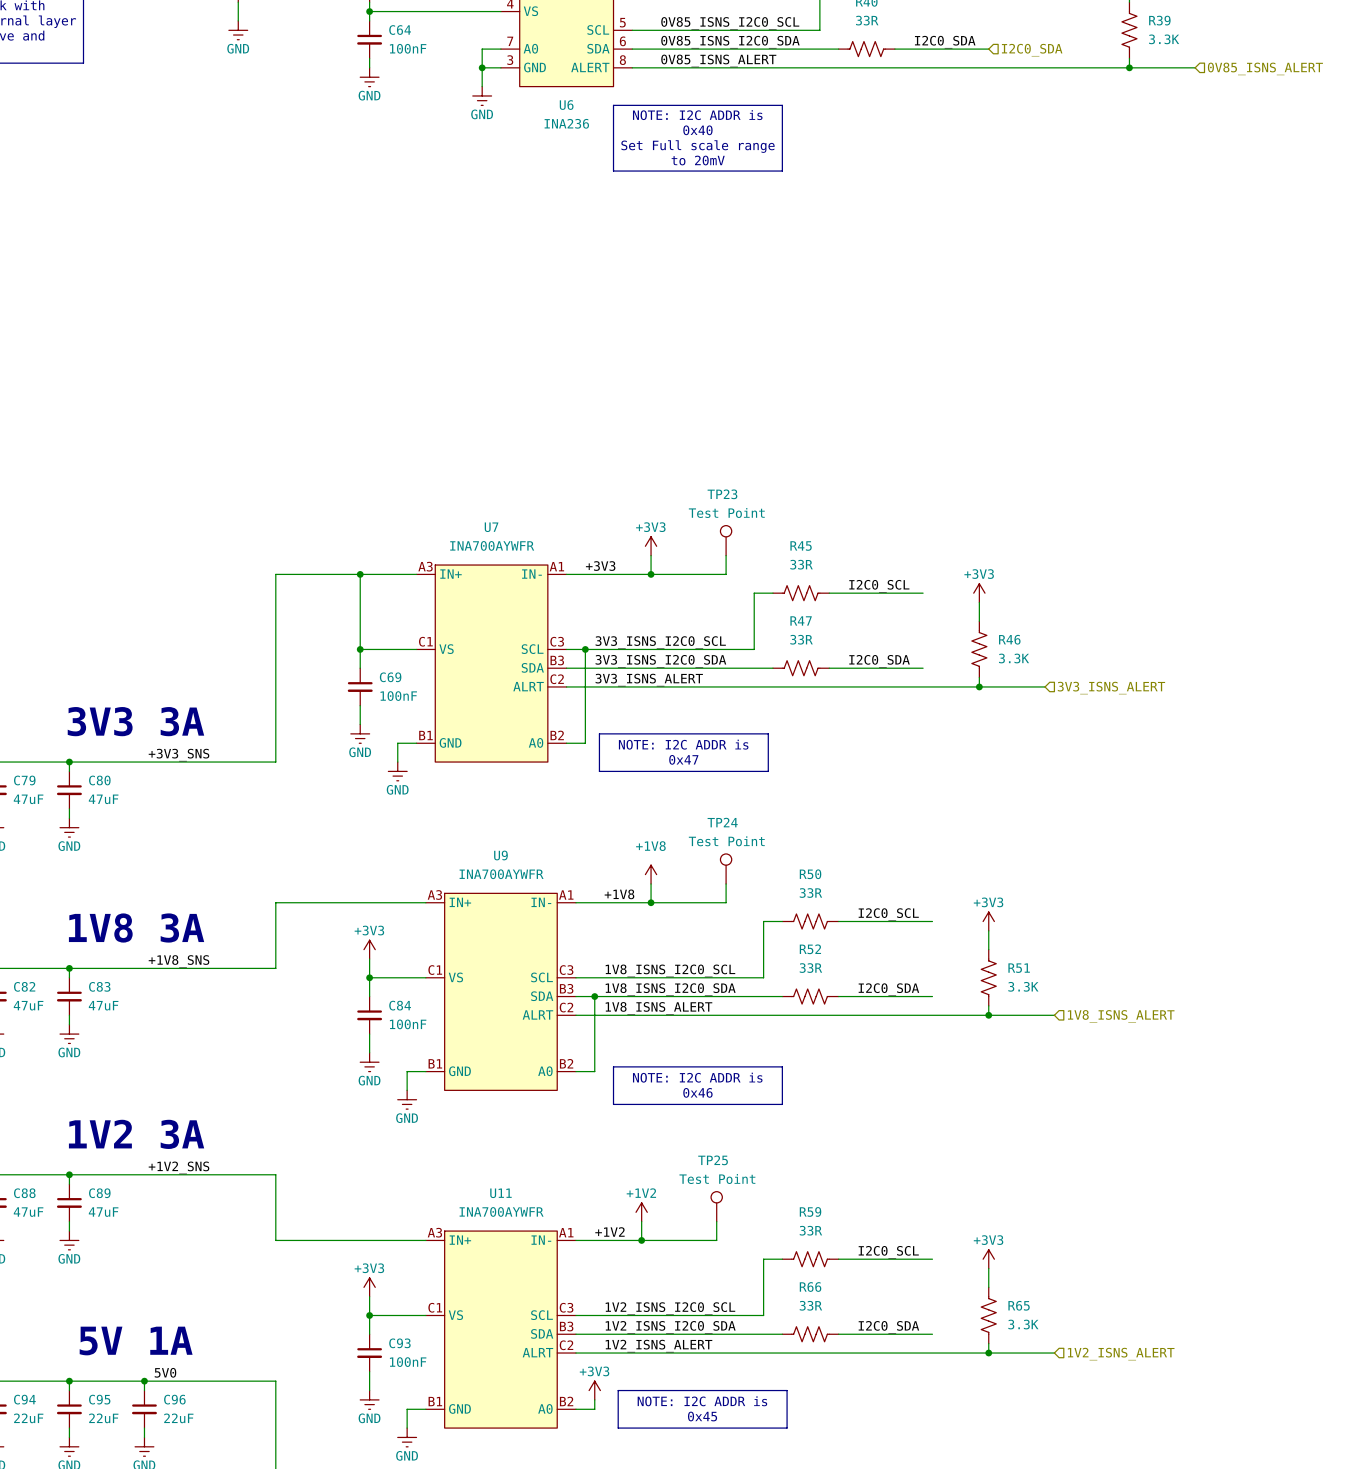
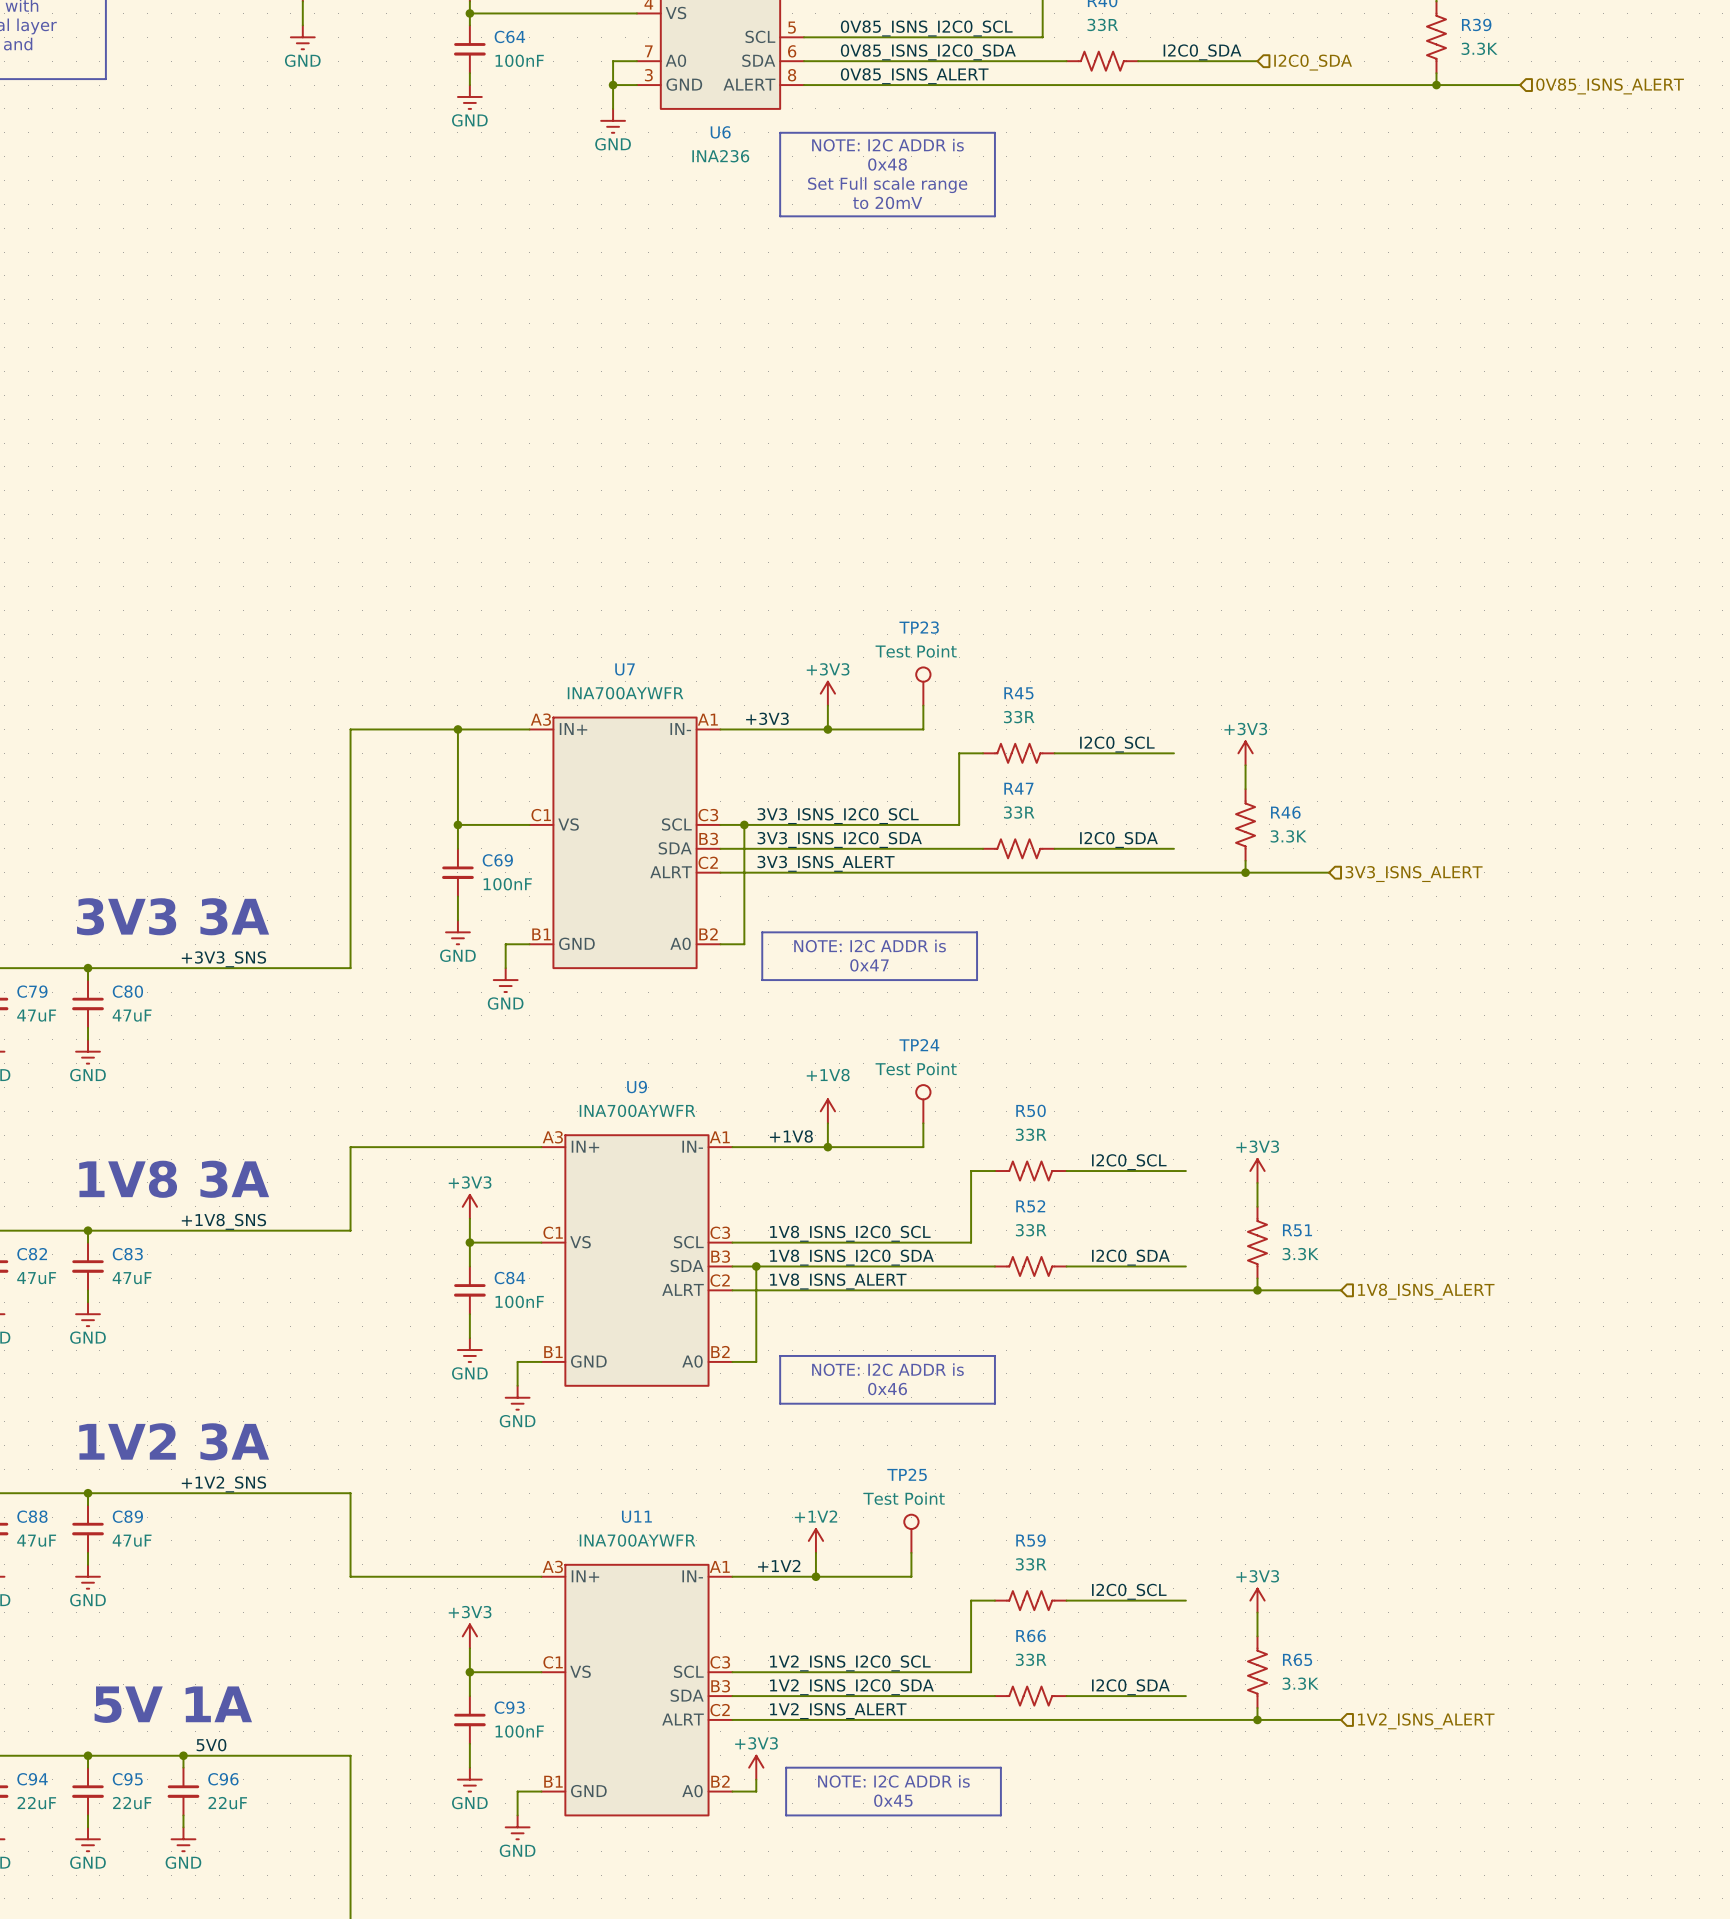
text: 0x40 (697, 130) -> 0x48 (887, 164)

